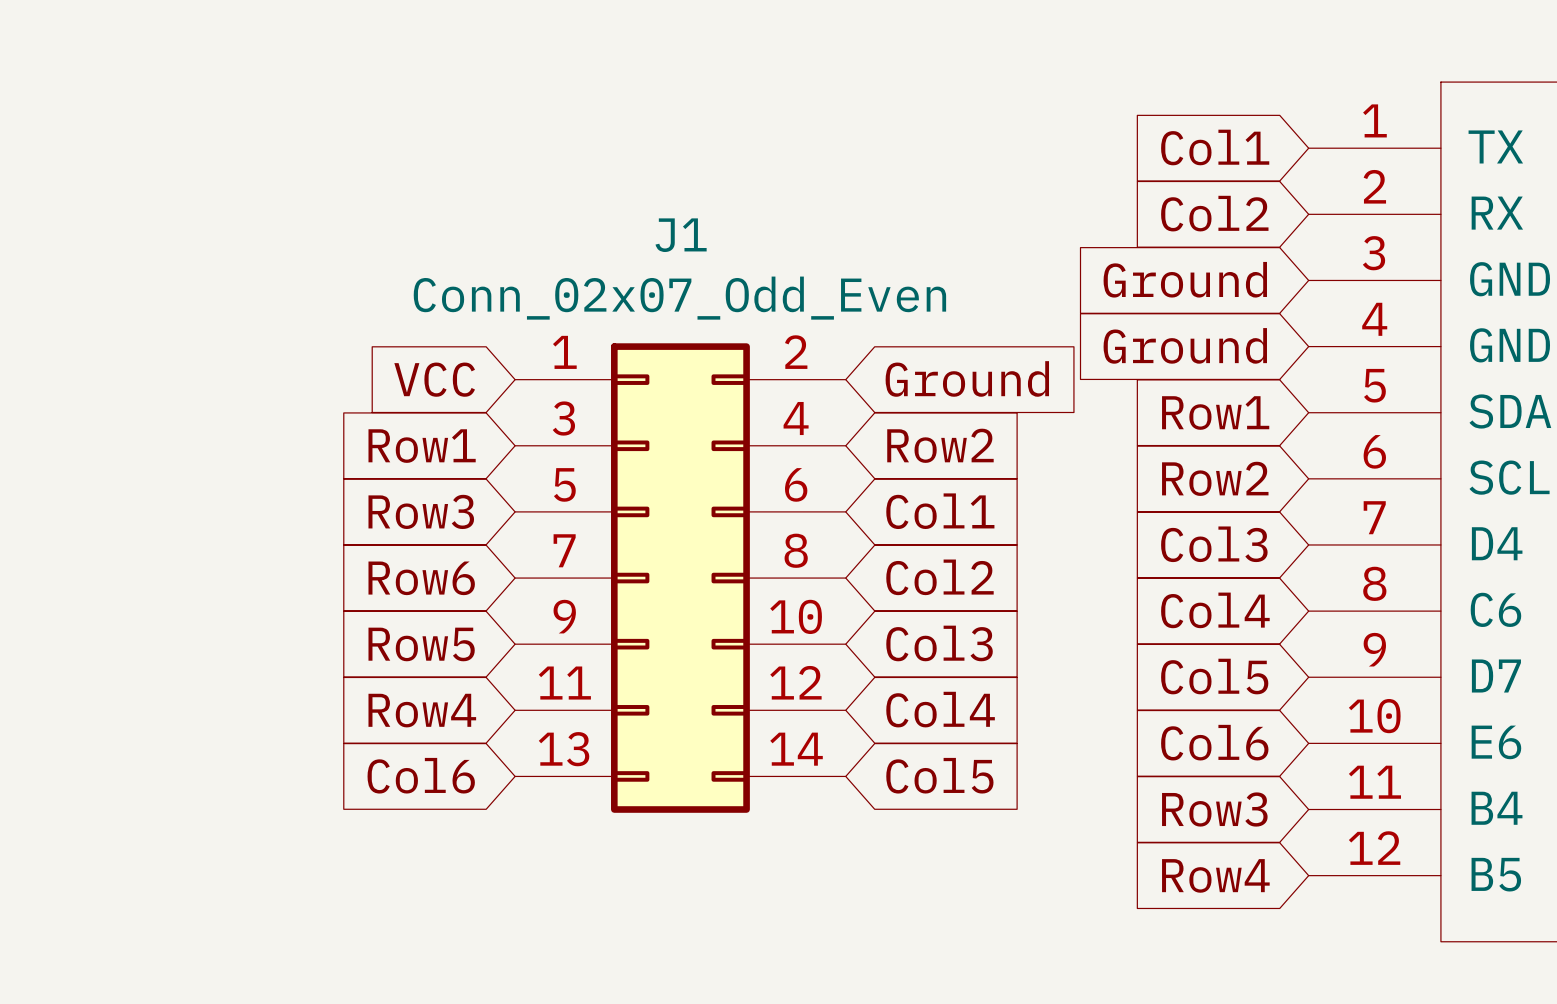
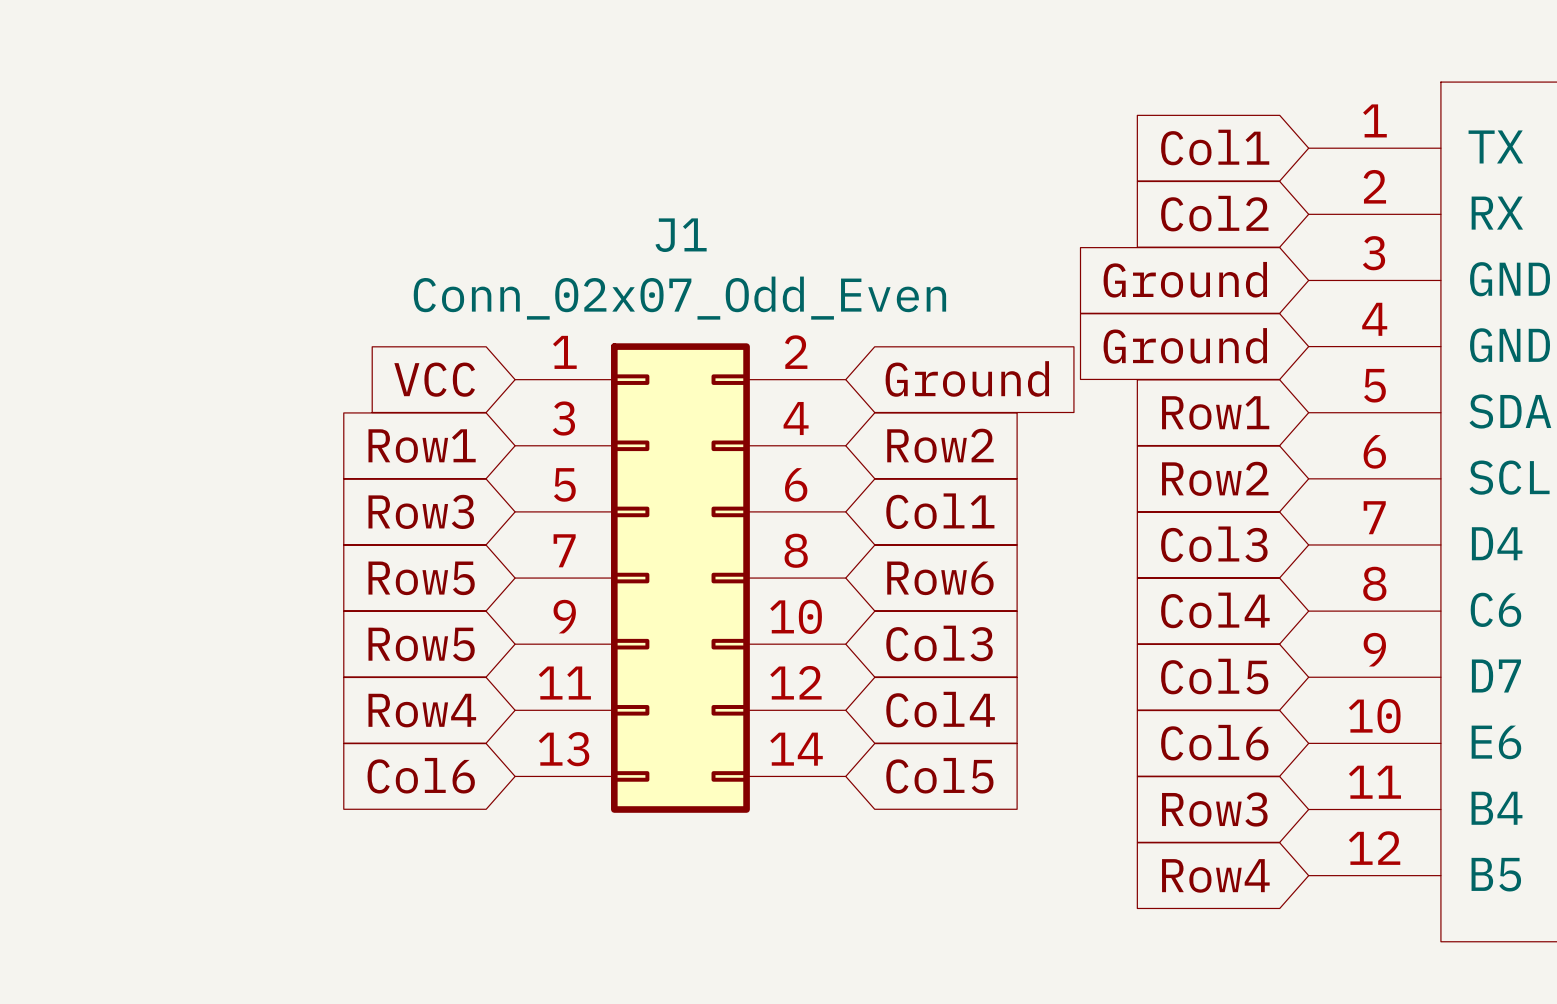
global label: Col2 (939, 577) -> Row6 (940, 578)
global label: Row6 (421, 578) -> Row5 (421, 578)

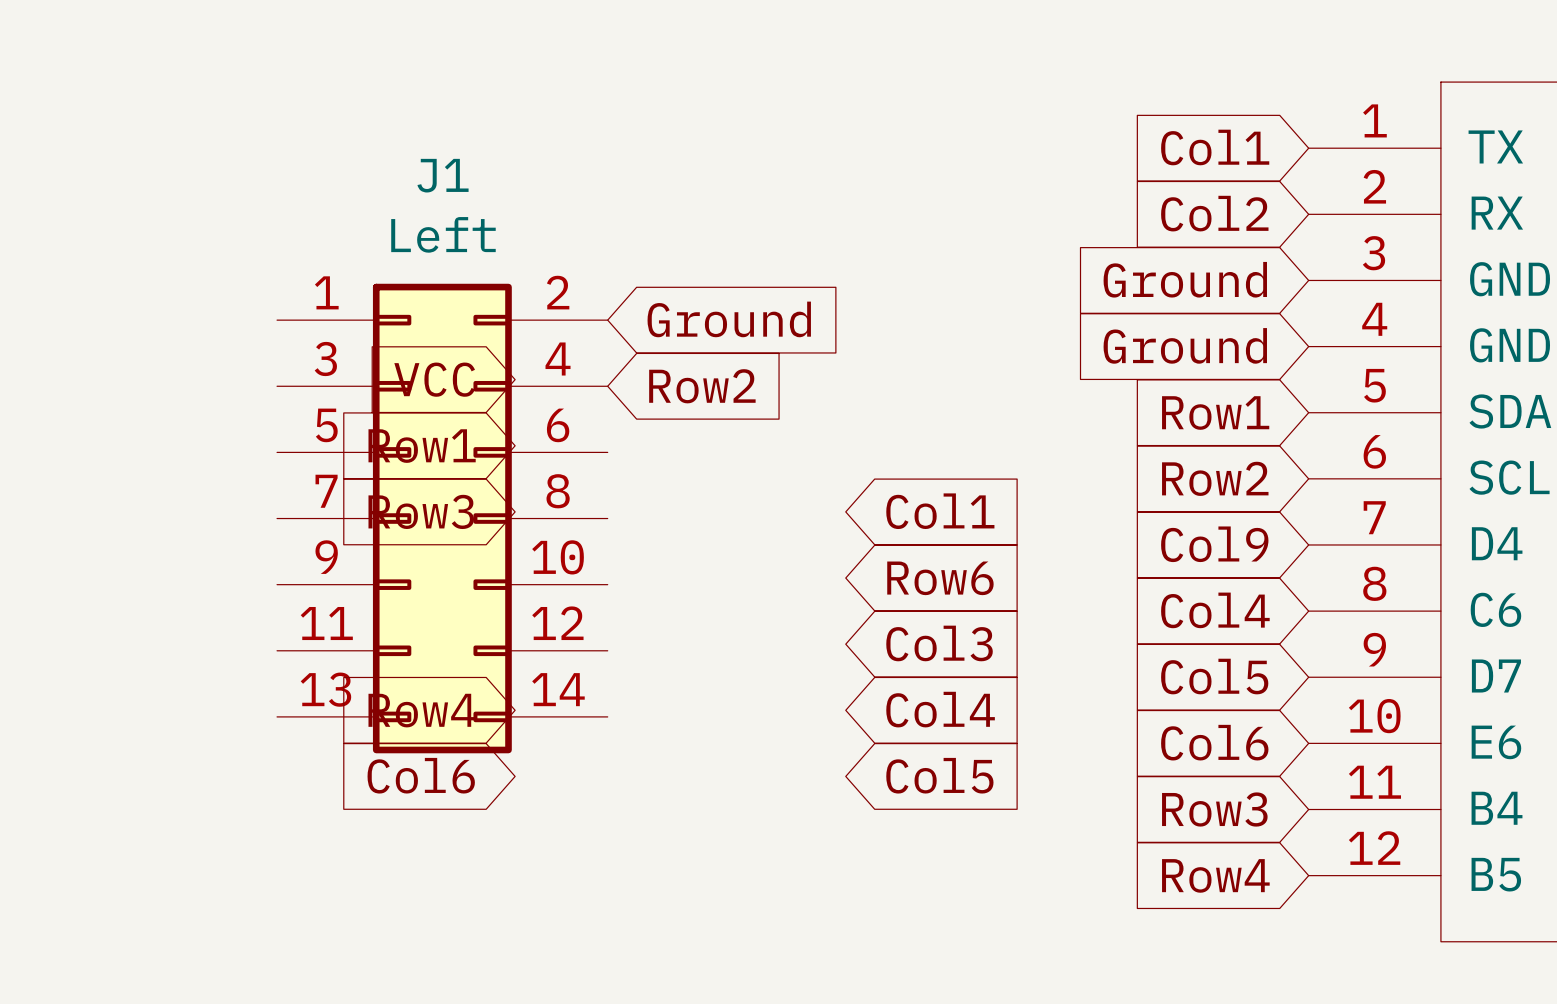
J1 value: Conn_02x07_Odd_Even (679, 298) -> Left (443, 234)
global label position: Ground (967, 378) -> Ground (729, 319)
global label position: Row2 (940, 445) -> Row2 (702, 386)
global label: Col3 (1214, 544) -> Col9 (1214, 544)
global label: Row5 (421, 578) -> none
J1 position: (680, 578) -> (442, 518)
global label: Row5 (421, 644) -> none

